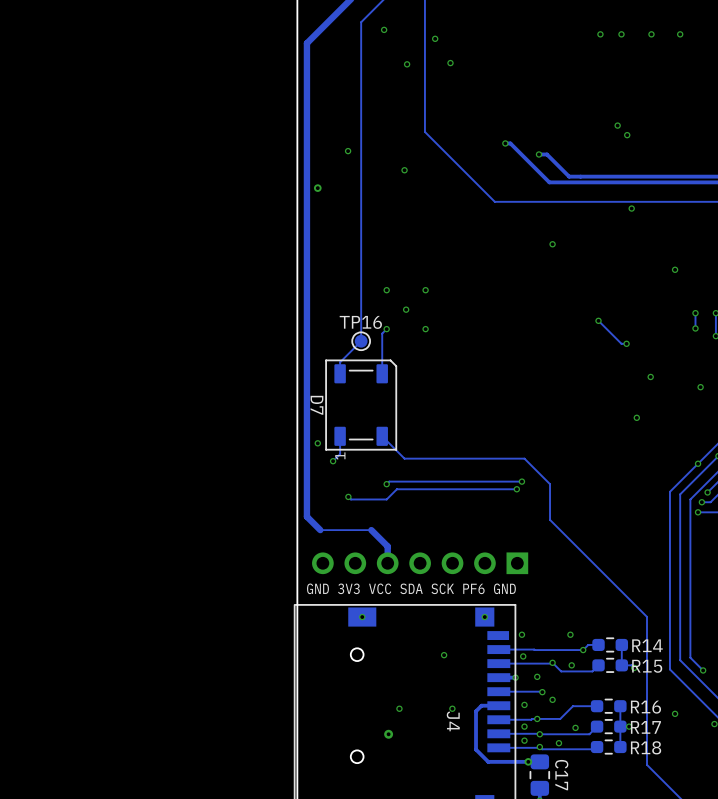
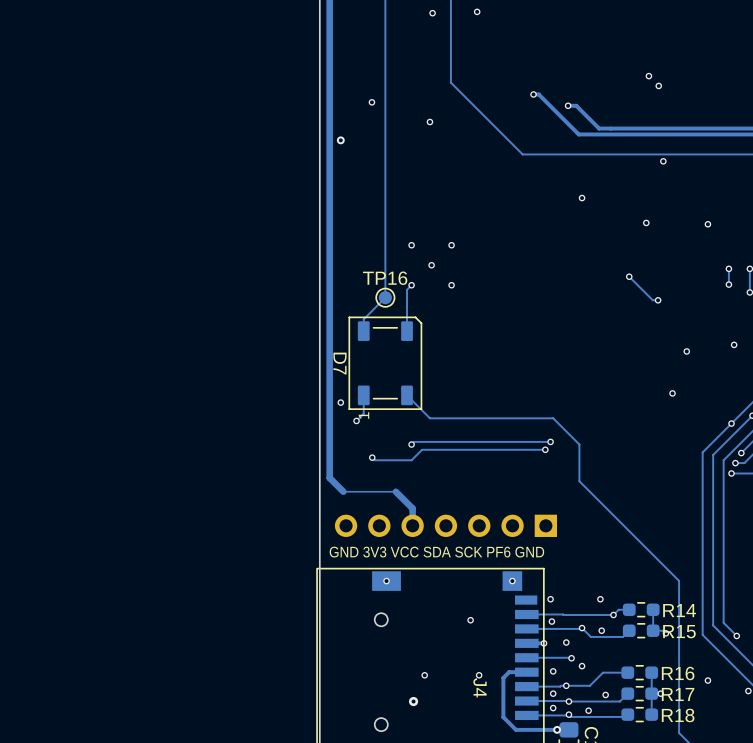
via: none -> (646, 222)
via: (650, 376) -> none
via: none -> (686, 351)
via: (636, 417) -> none
via: none -> (672, 393)

